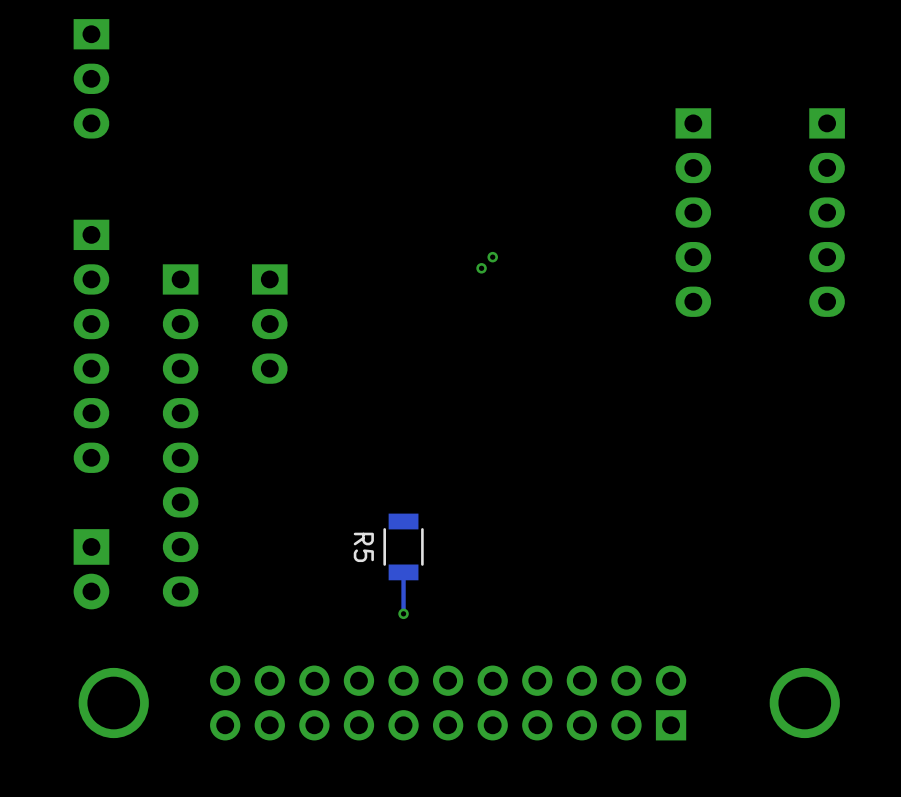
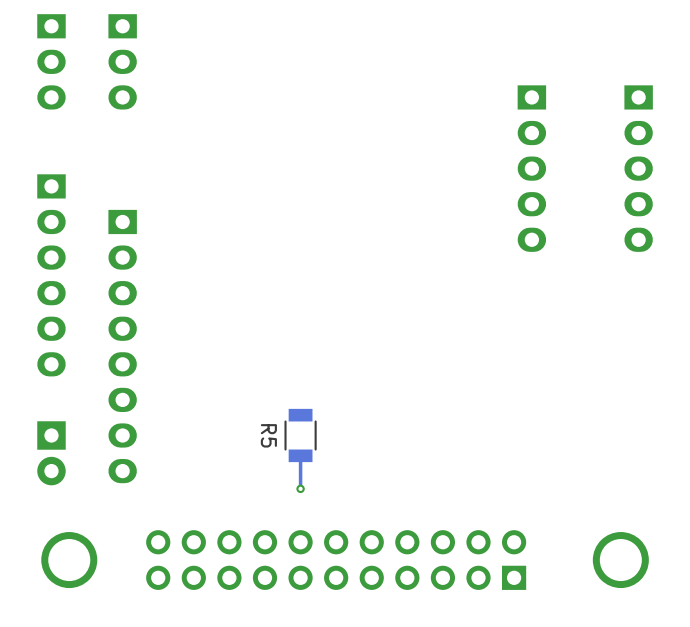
via: (492, 257) -> none
via: (481, 268) -> none
part position: (269, 324) -> (122, 61)

